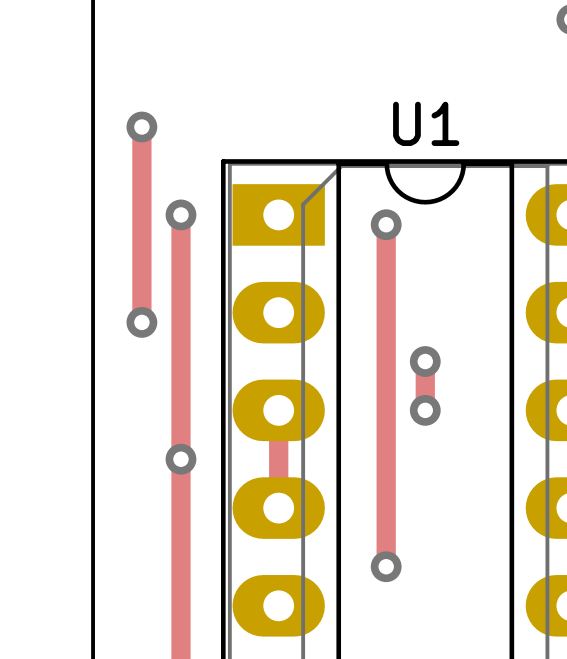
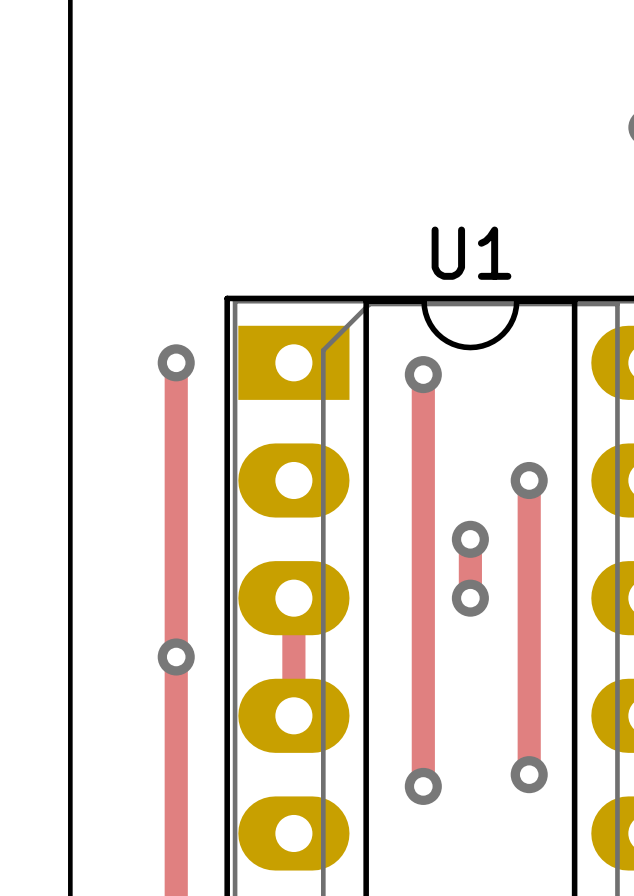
track: (141, 126) (141, 322) -> none
via: (141, 126) -> none
track: none -> (529, 480) (529, 774)
via: none -> (529, 480)
via: (141, 322) -> none
via: none -> (529, 774)

